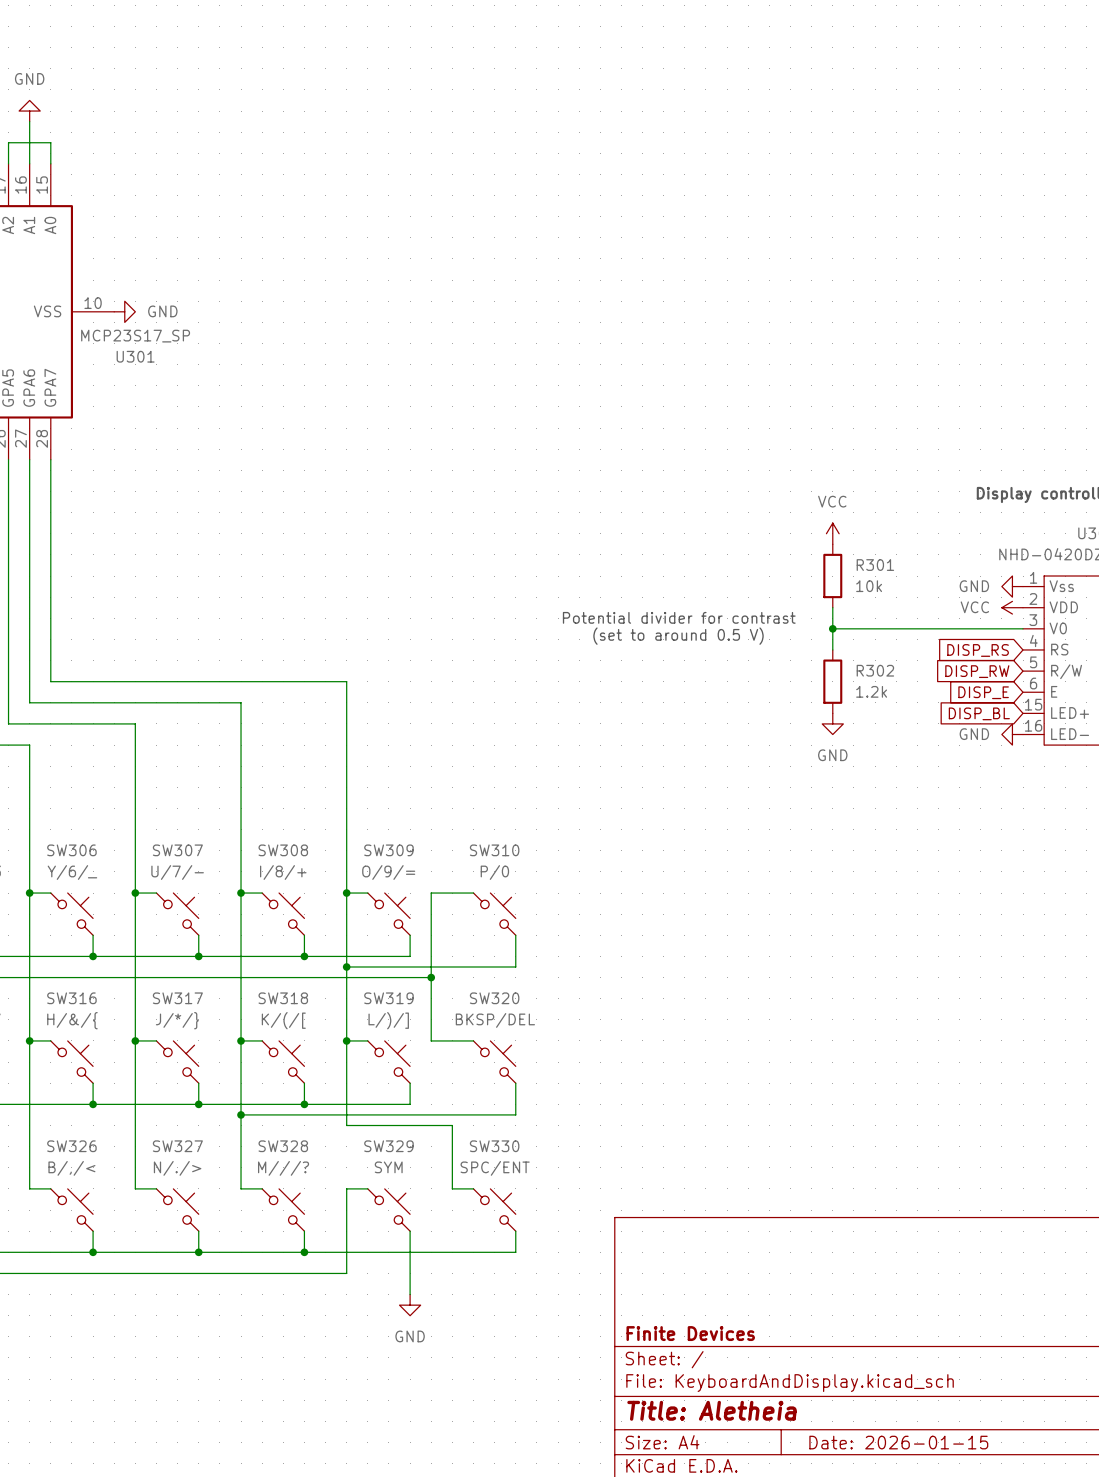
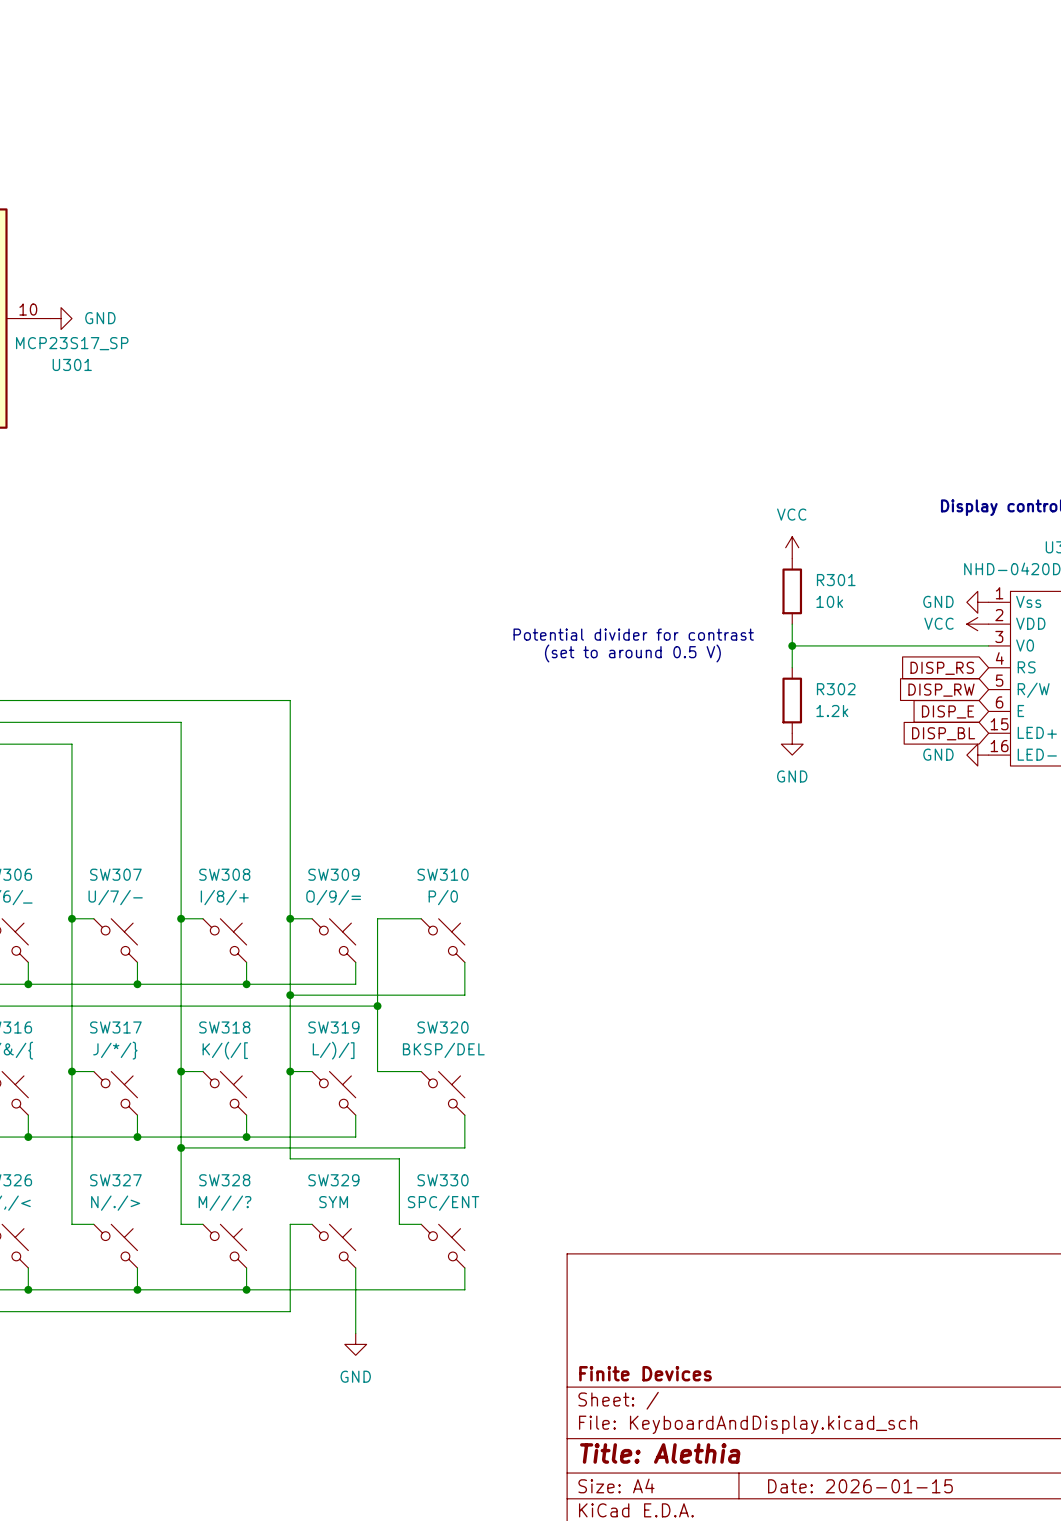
title block: Title: Aletheia (712, 1410) -> Title: Alethia (660, 1453)

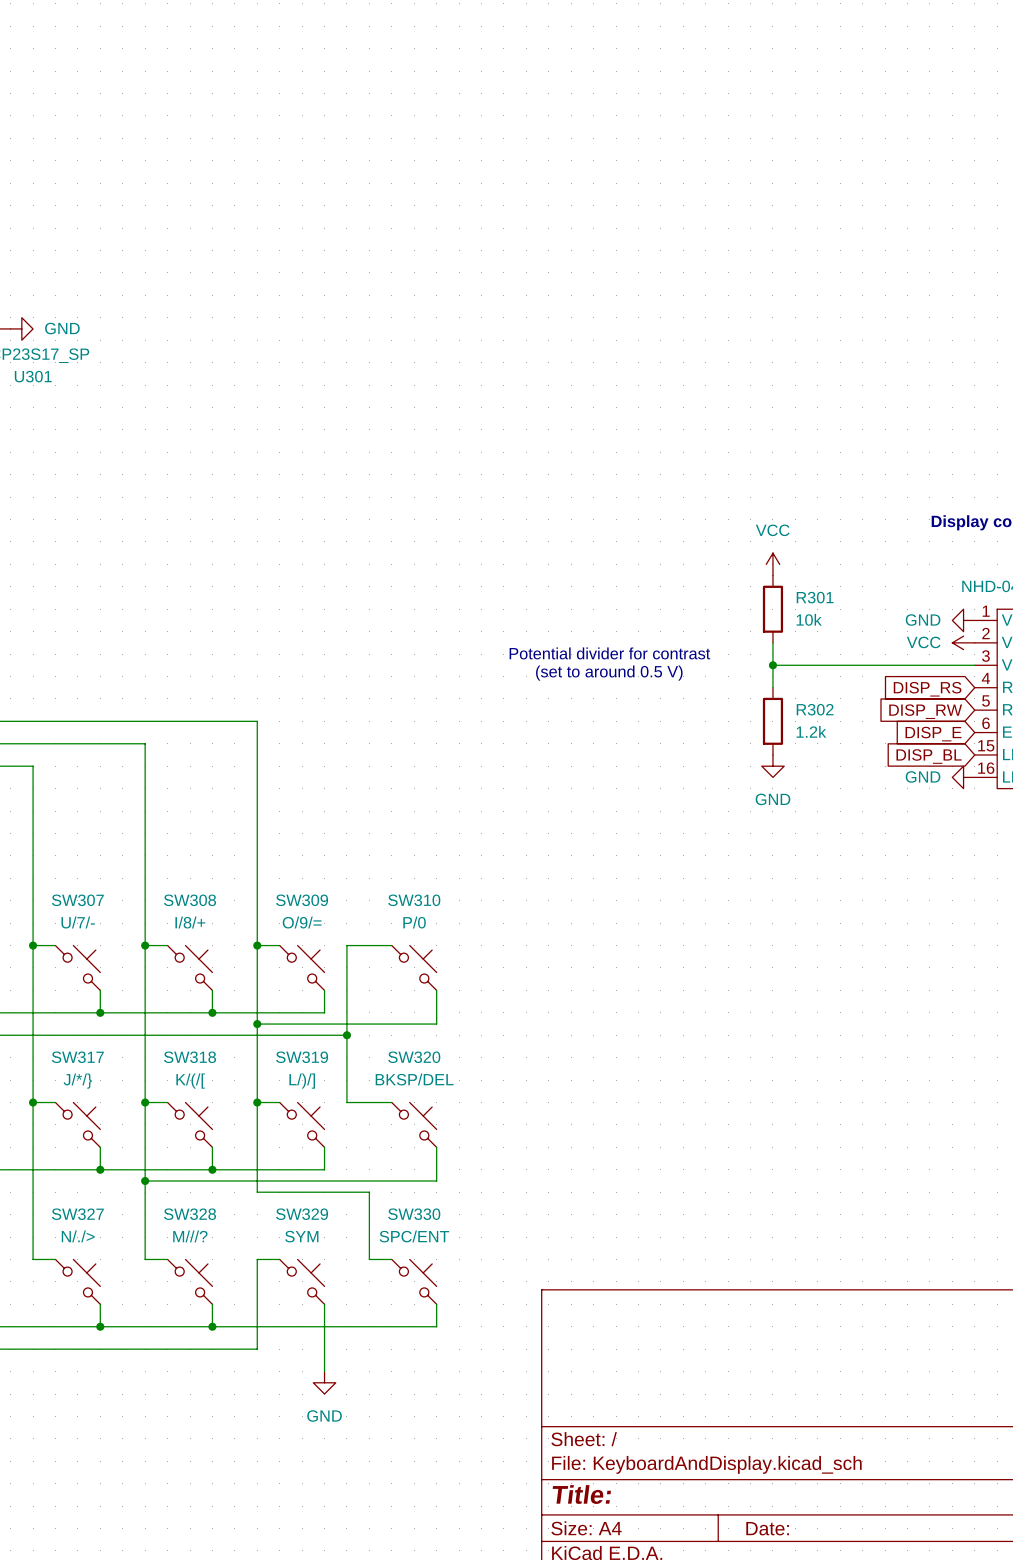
title block: Finite Devices (645, 1373) -> none
title block: Title: Alethia (660, 1453) -> Title: (581, 1494)
title block: Date: 2026-01-15 (860, 1486) -> Date: (767, 1528)

